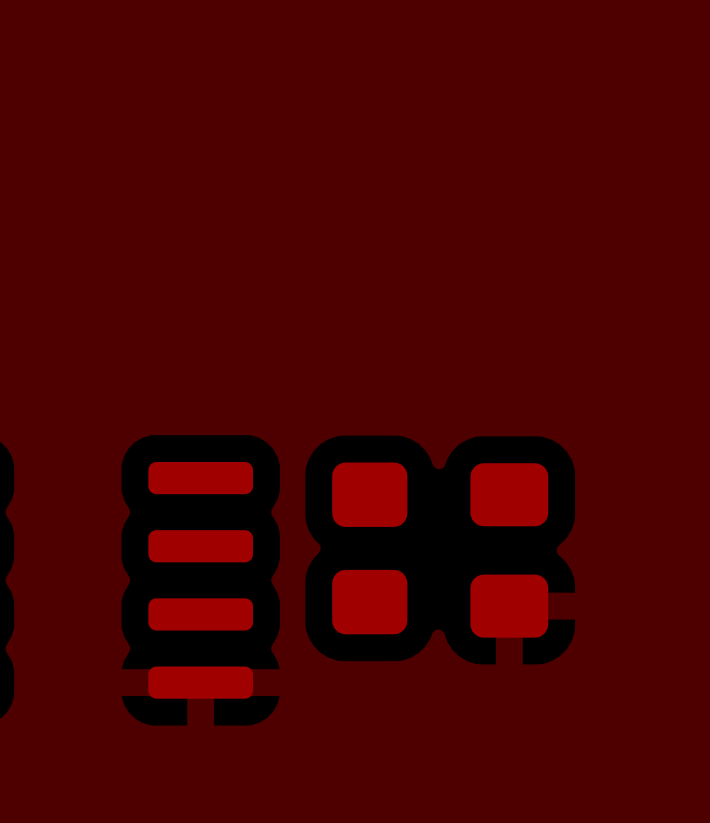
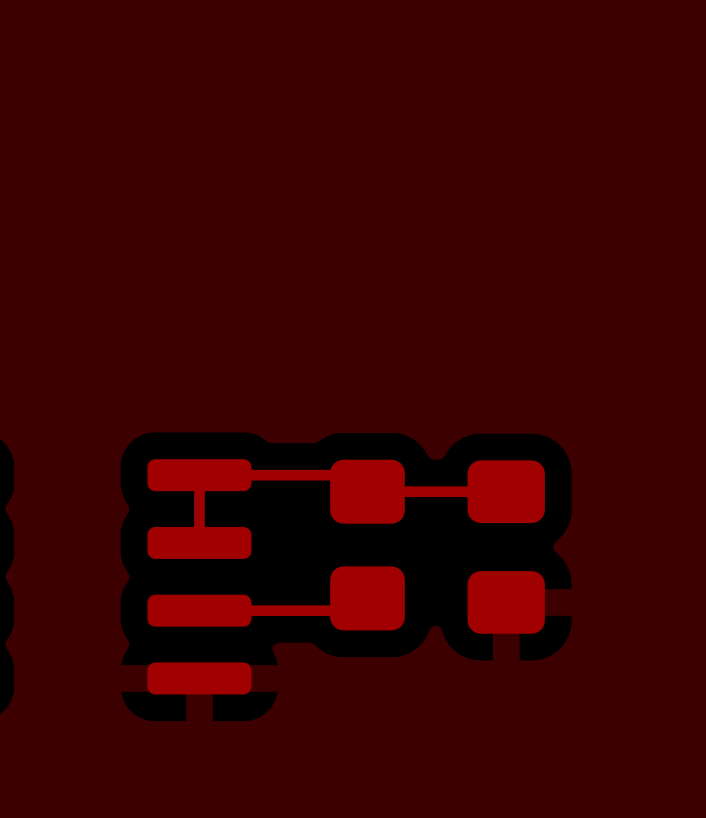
top track: none -> (350, 475) (199, 475) (199, 542)
top track: none -> (506, 491) (367, 491)
top track: none -> (355, 610) (199, 610)

